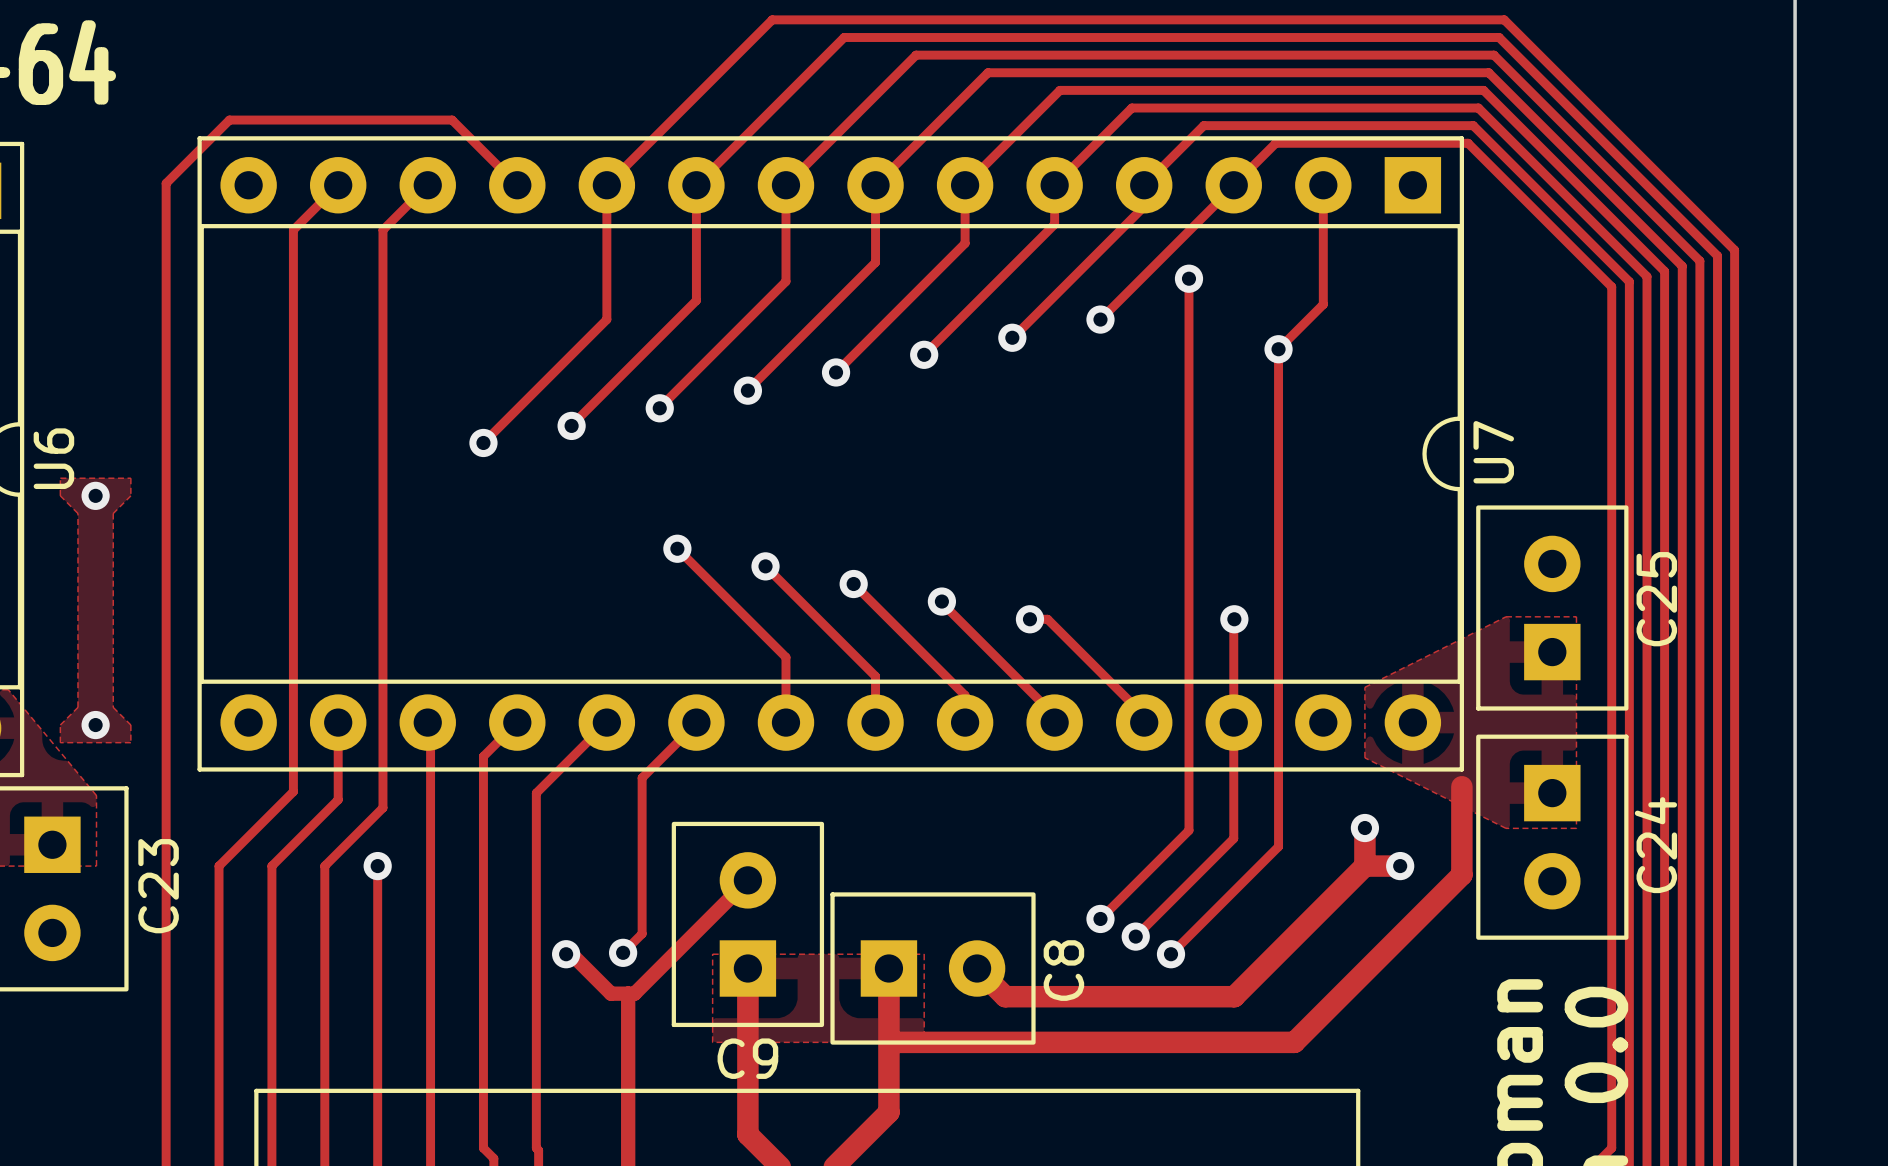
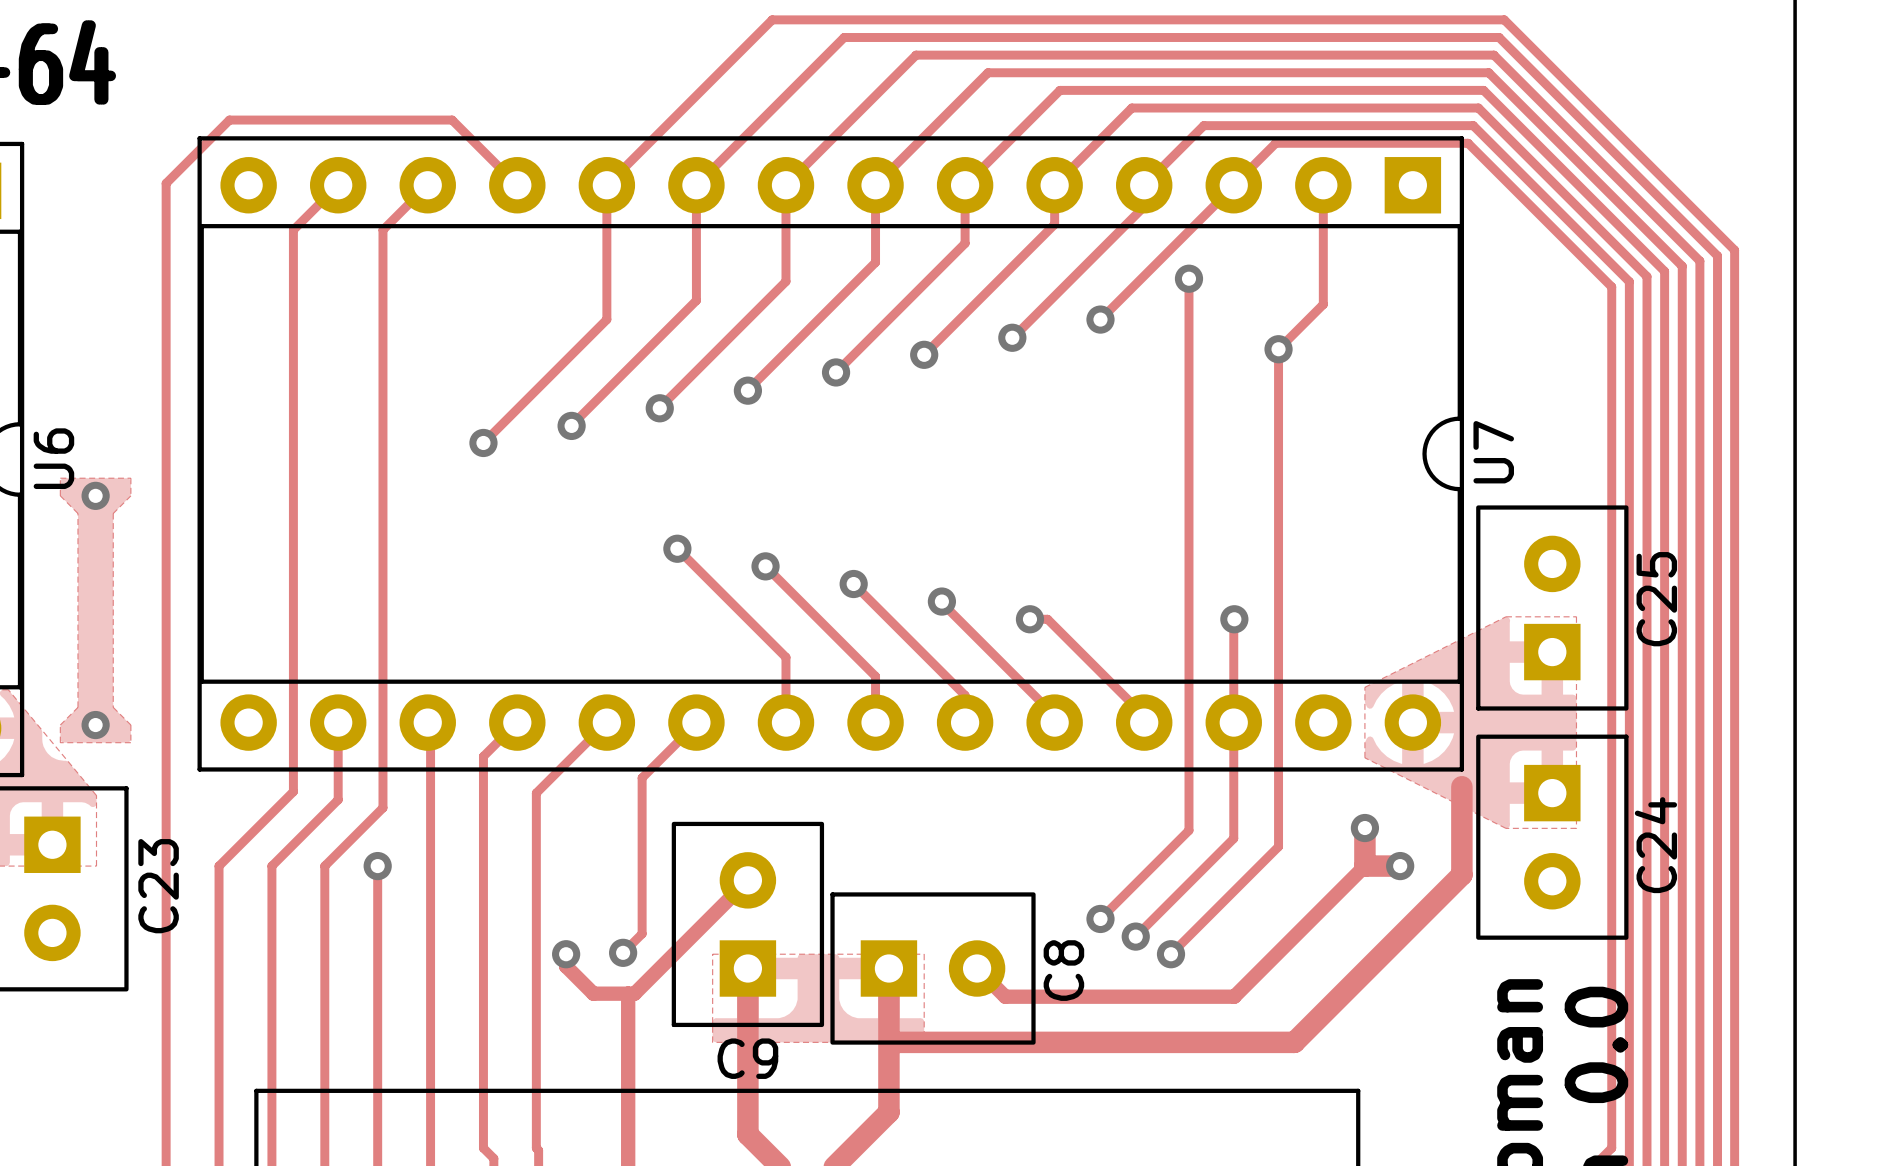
track width: thick (1364, 866) (1234, 996) (1005, 996) (977, 968) -> thin (1364, 866) (1234, 996) (1005, 996) (977, 968)
track: (566, 954) (571, 954) (611, 993) -> (566, 954) (566, 966) (593, 993) (611, 993)

